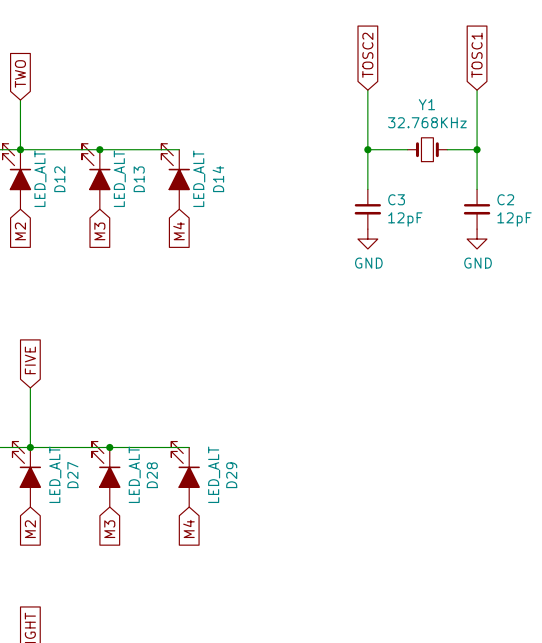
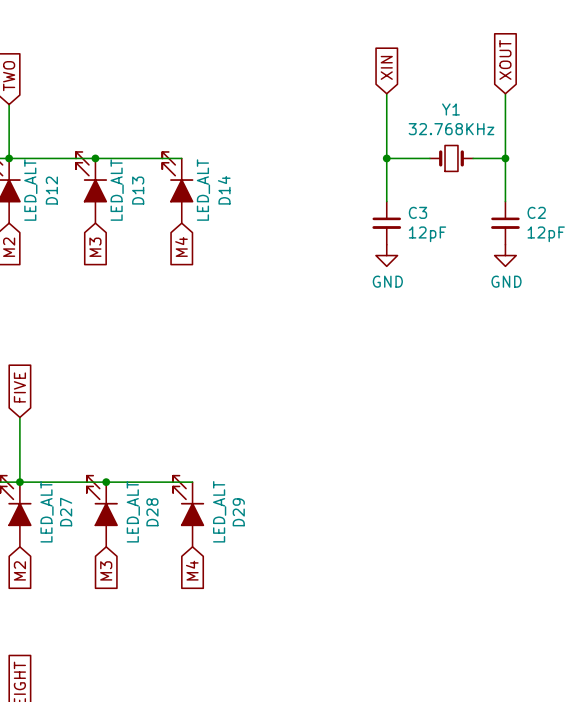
global label: TOSC2 (367, 55) -> XIN (386, 67)
global label: TOSC1 (477, 55) -> XOUT (505, 59)

